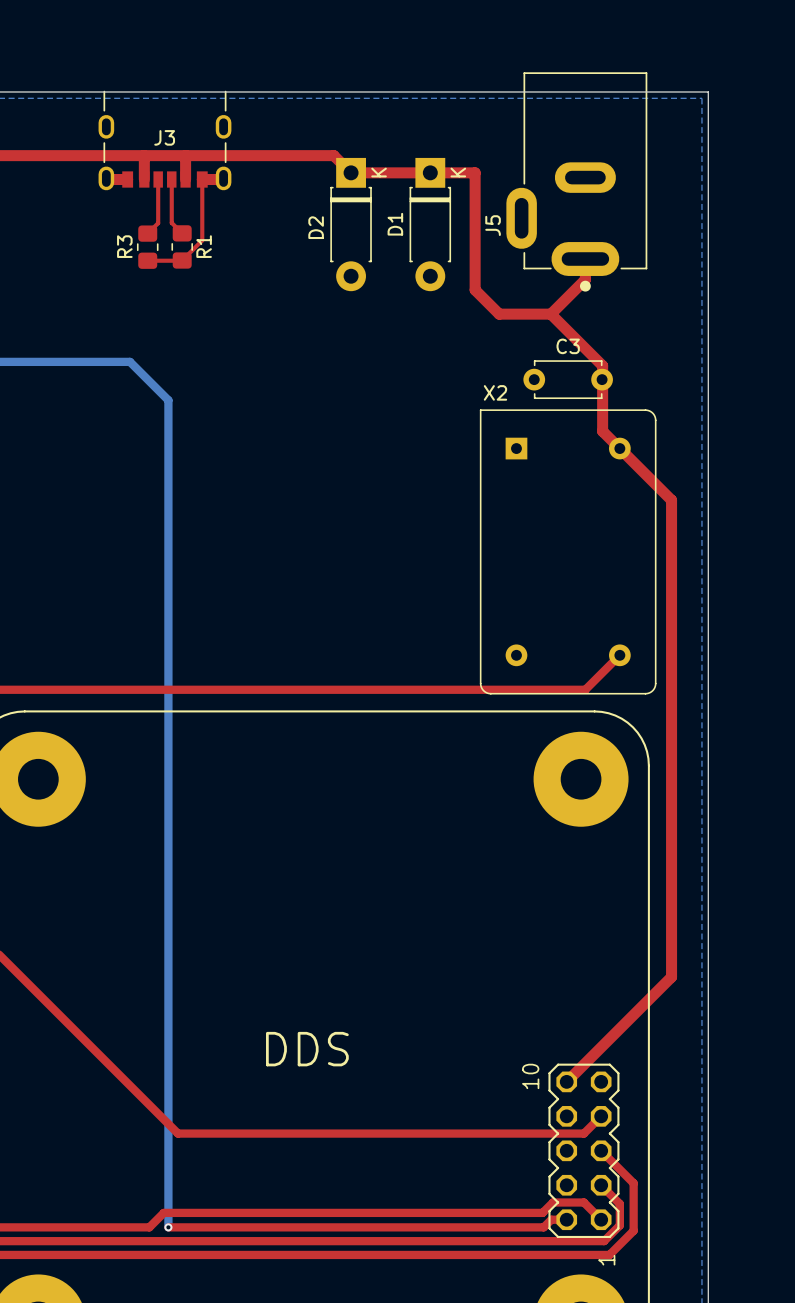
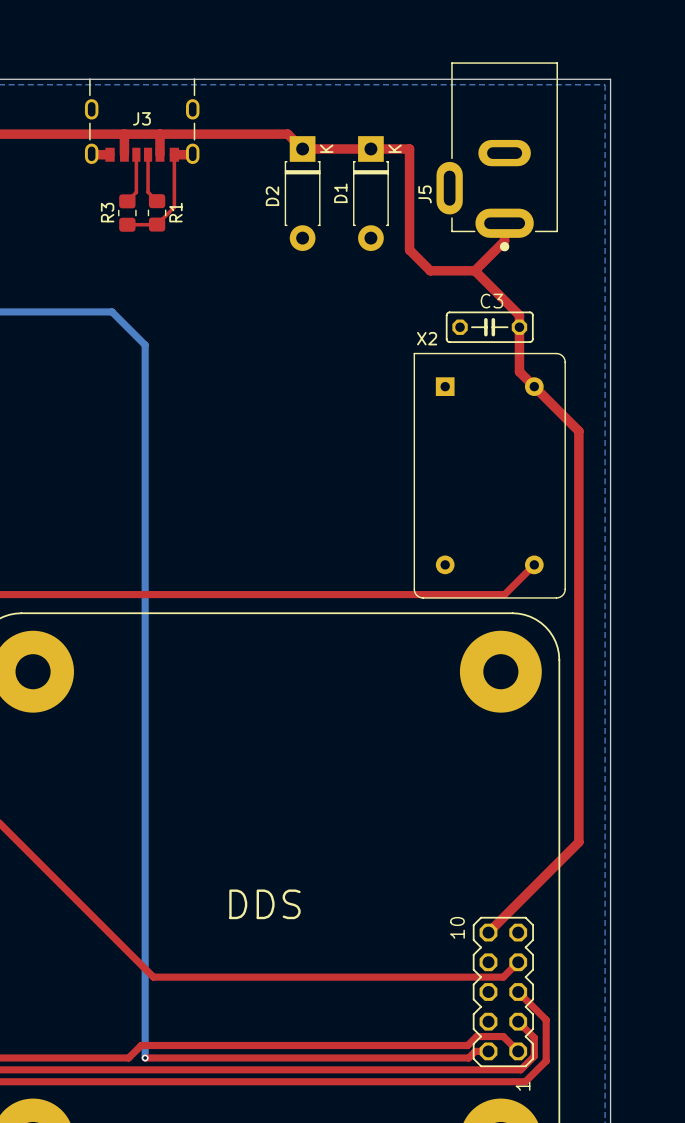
C3 footprint: [523, 360, 613, 400] -> [445, 311, 534, 343]

